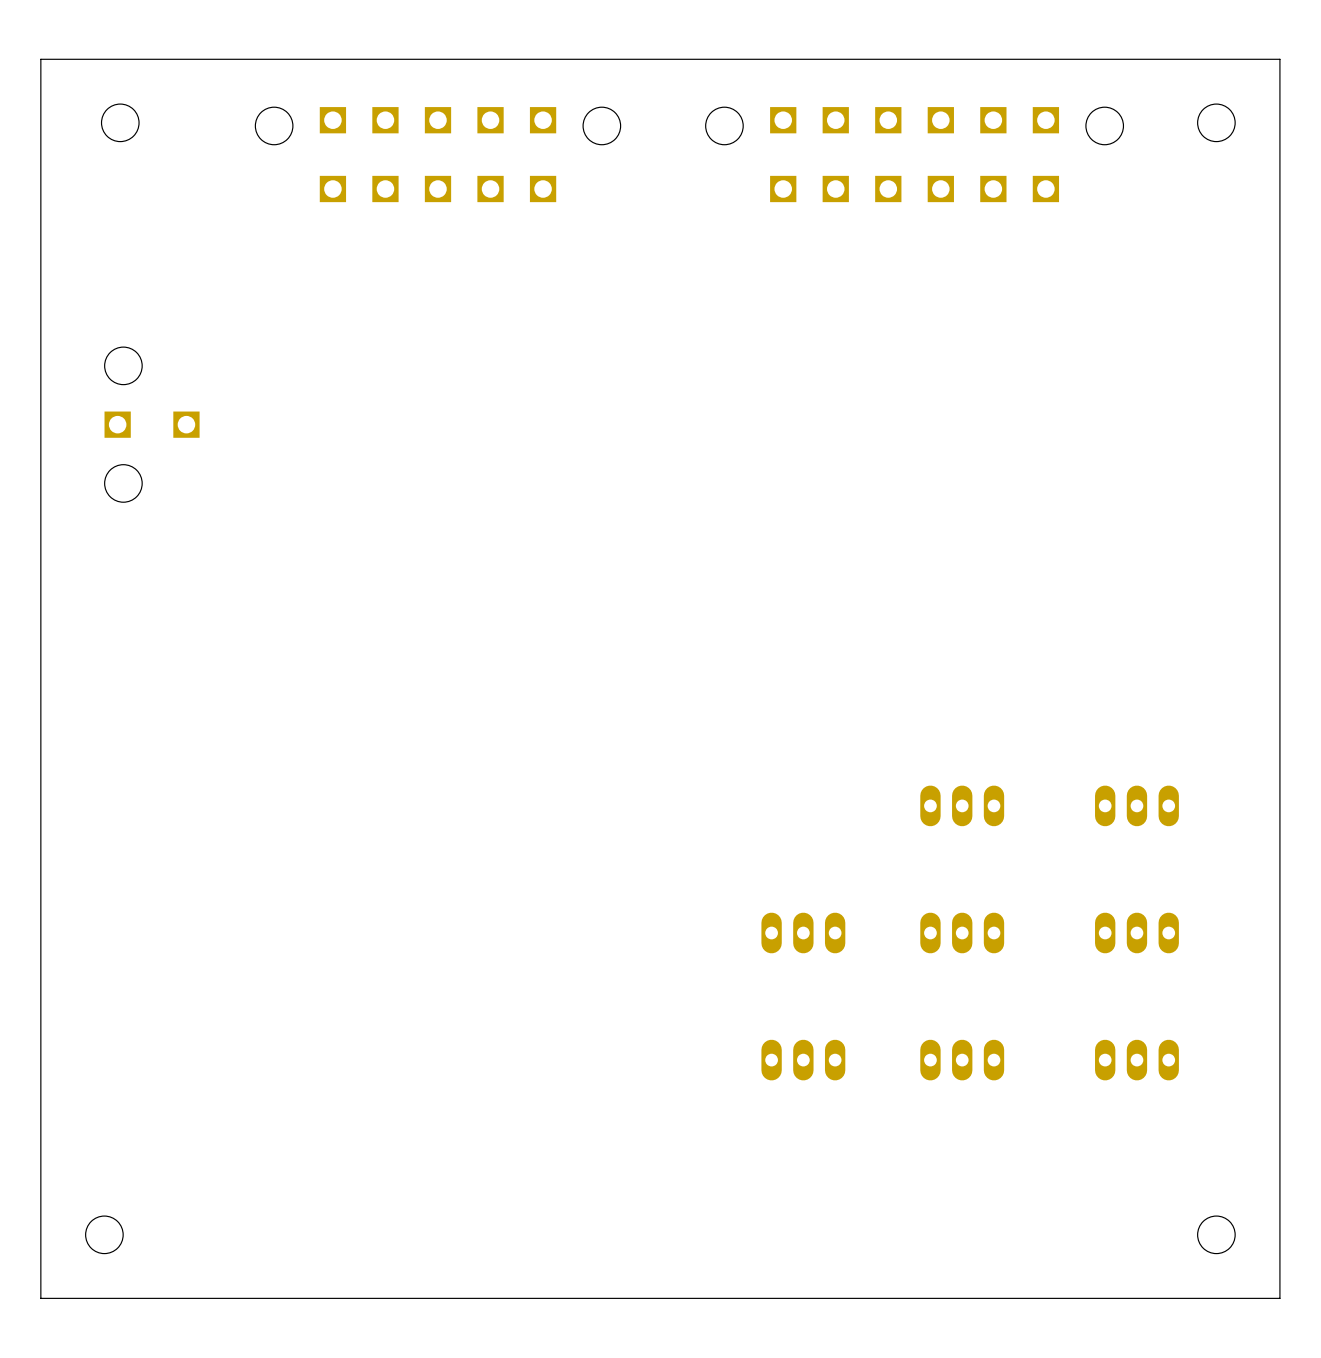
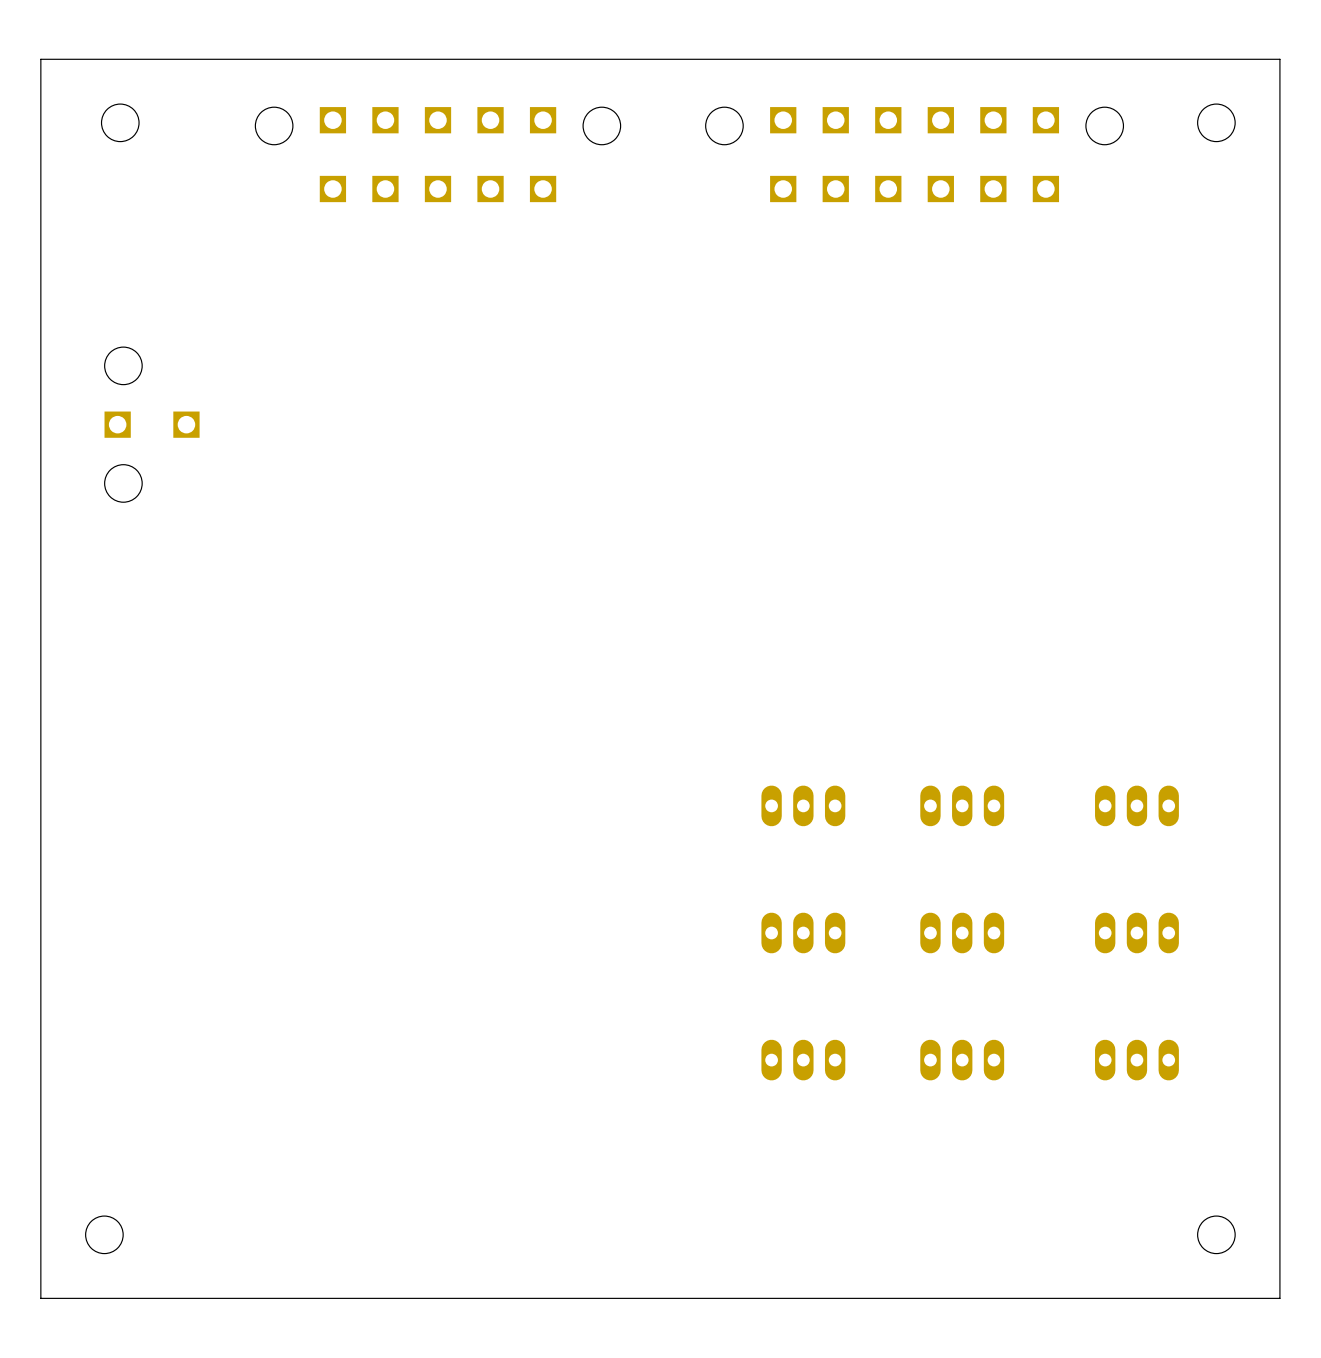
part: none -> (803, 805)

